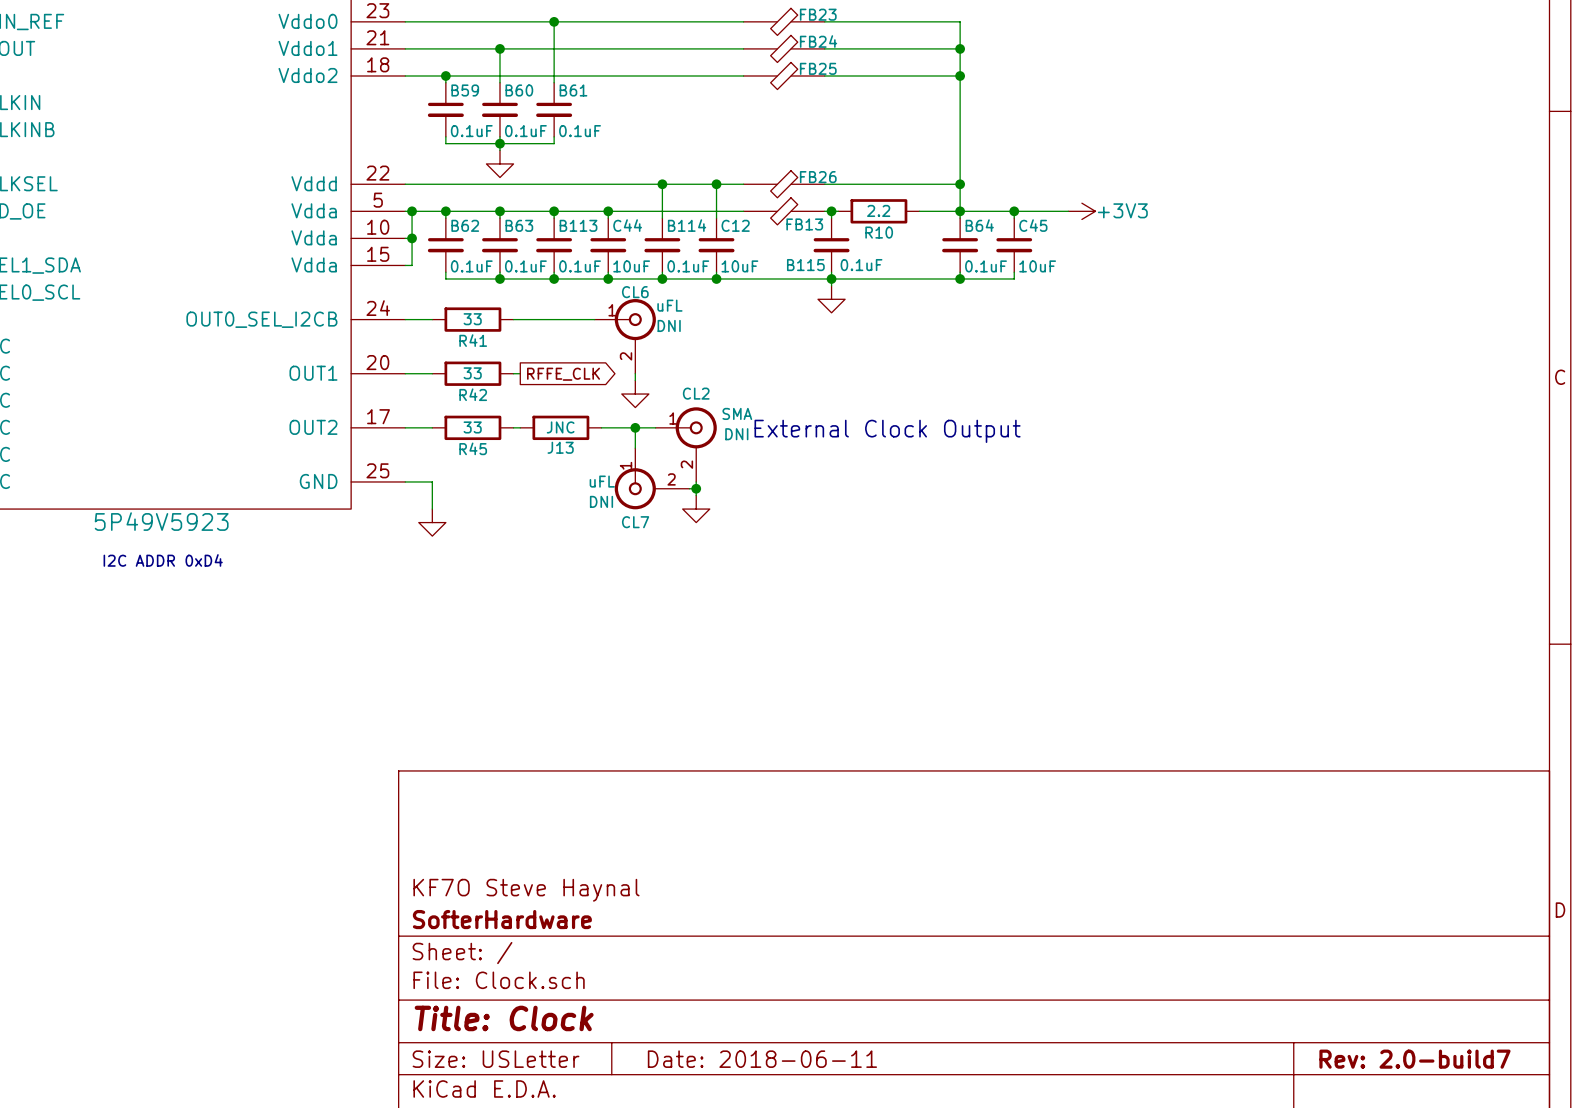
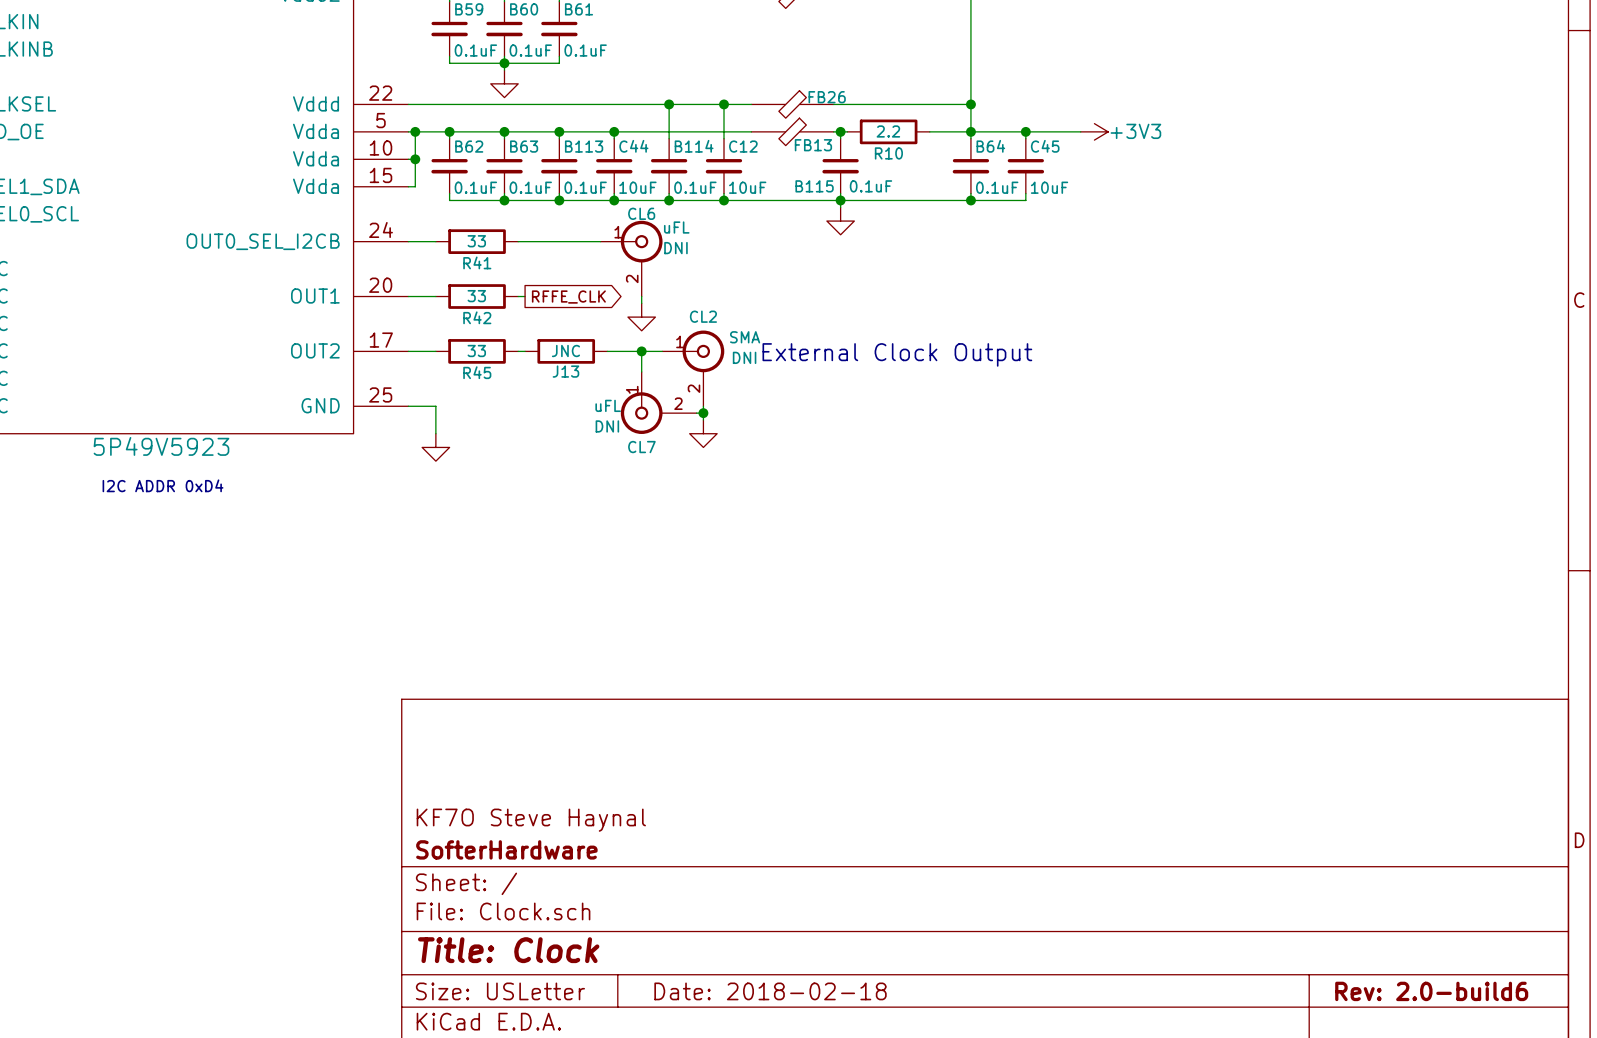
title block: Date: 2018-06-11 (762, 1059) -> Date: 2018-02-18 (770, 991)
title block: Rev: 2.0-build7 (1414, 1059) -> Rev: 2.0-build6 (1431, 991)

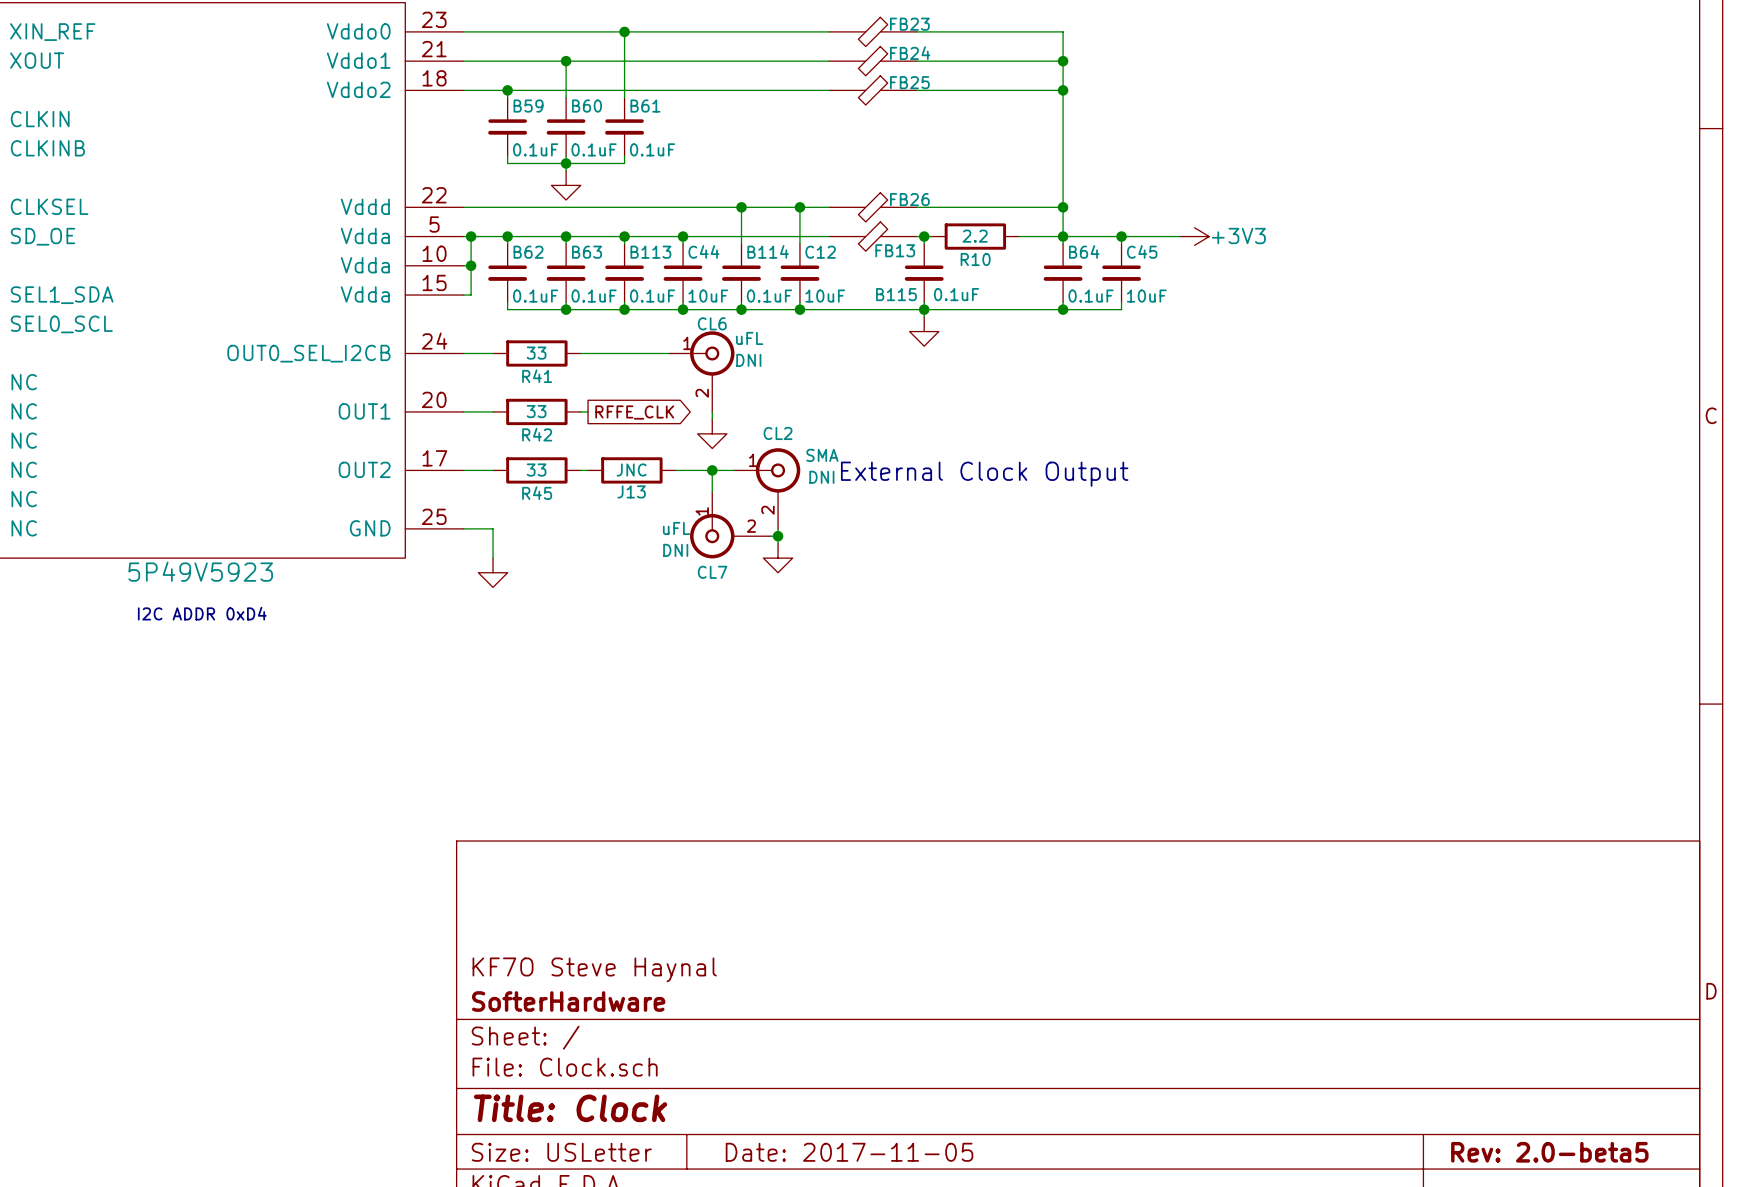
title block: Date: 2018-02-18 (770, 991) -> Date: 2017-11-05 (849, 1152)
title block: Rev: 2.0-build6 (1431, 991) -> Rev: 2.0-beta5 (1549, 1152)

